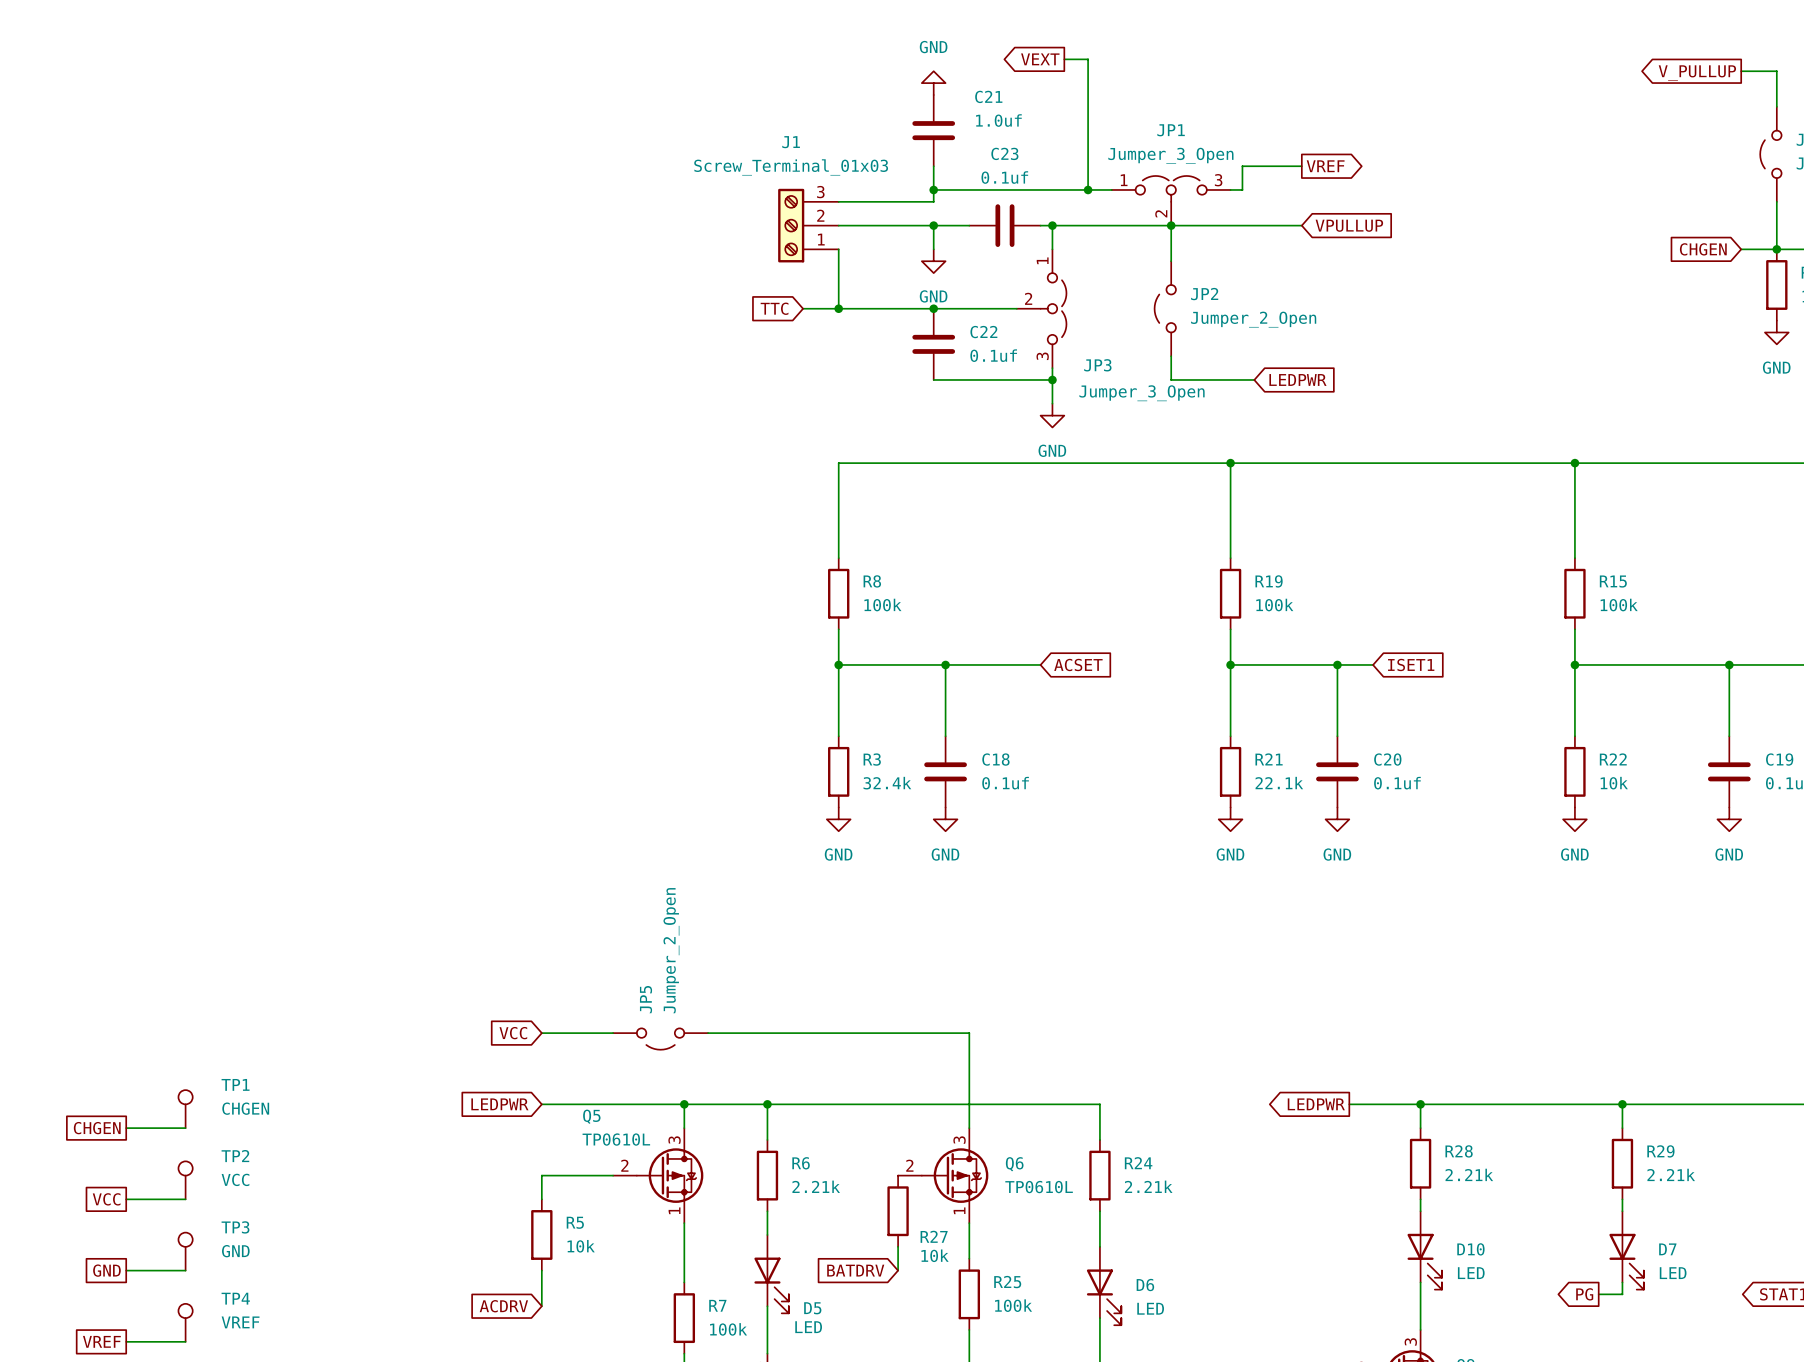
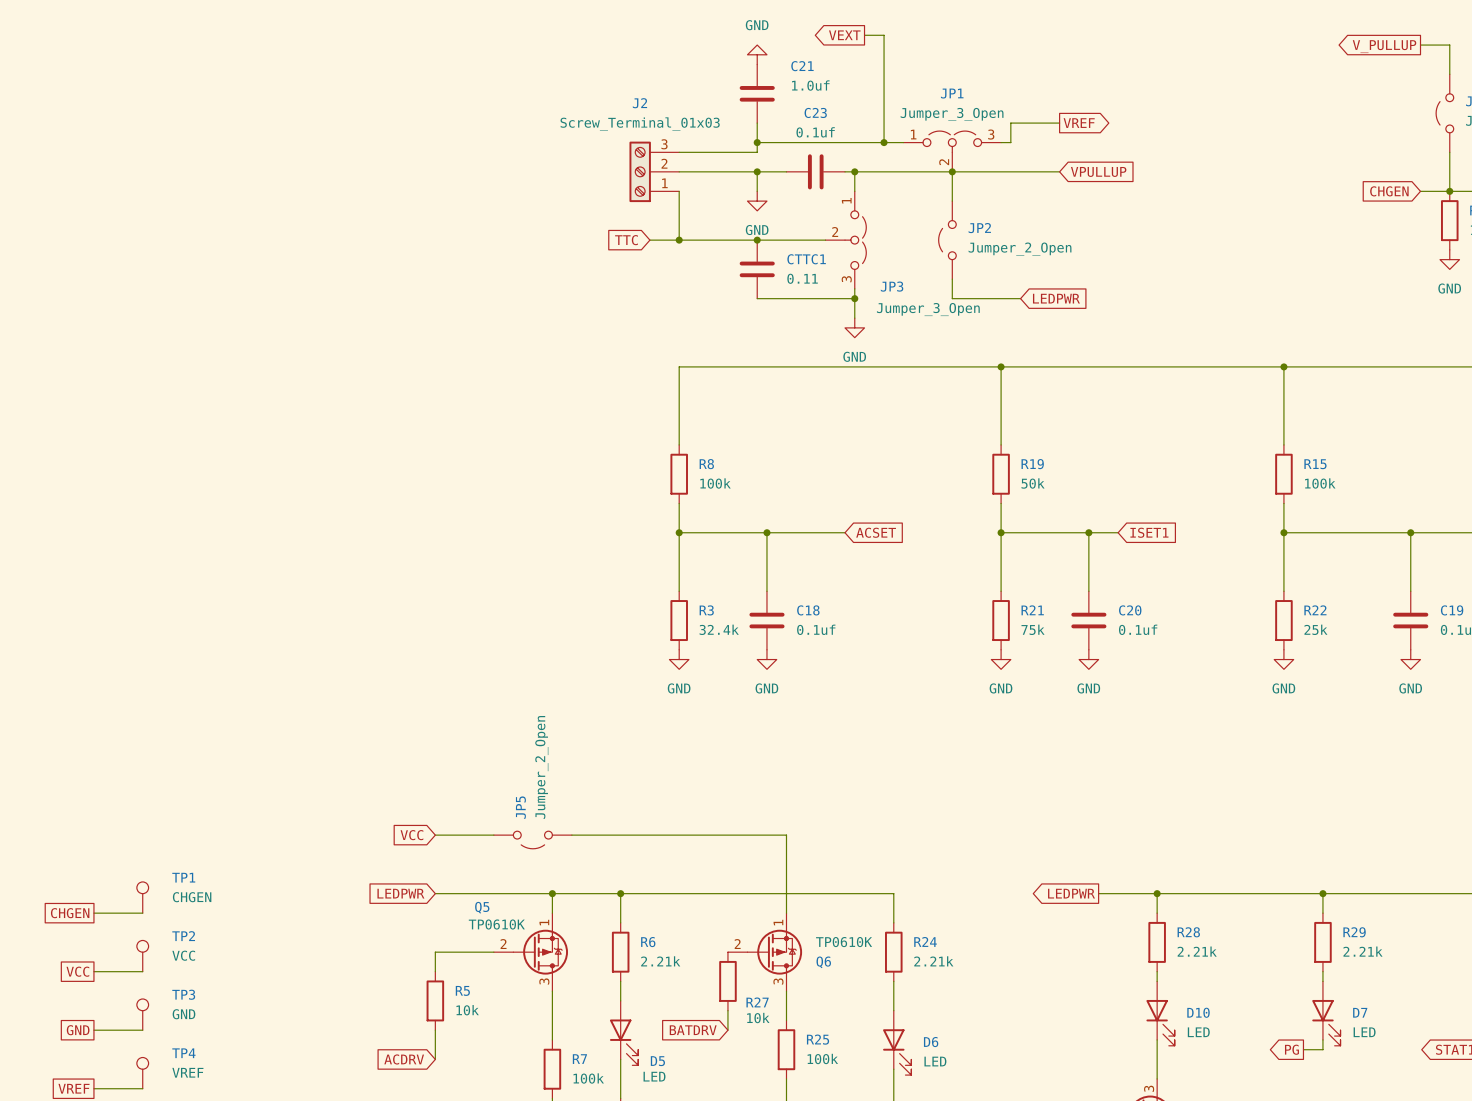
J1 name: J1 (791, 142) -> J2 (639, 103)
C22 name: C22 (983, 332) -> CTTC1 (806, 259)
C22 value: 0.1uf (993, 355) -> 0.11 (802, 278)
R19 value: 100k (1274, 605) -> 50k (1033, 483)
R21 value: 22.1k (1279, 783) -> 75k (1033, 629)
R22 value: 10k (1614, 783) -> 25k (1315, 629)
Q5 value: TP0610L (616, 1139) -> TP0610K (496, 924)
Q5 flip: as is (670, 1175) -> up-down (540, 952)
Q6 flip: as is (955, 1175) -> up-down (774, 952)
Q6 value: TP0610L (1039, 1187) -> TP0610K (844, 942)

